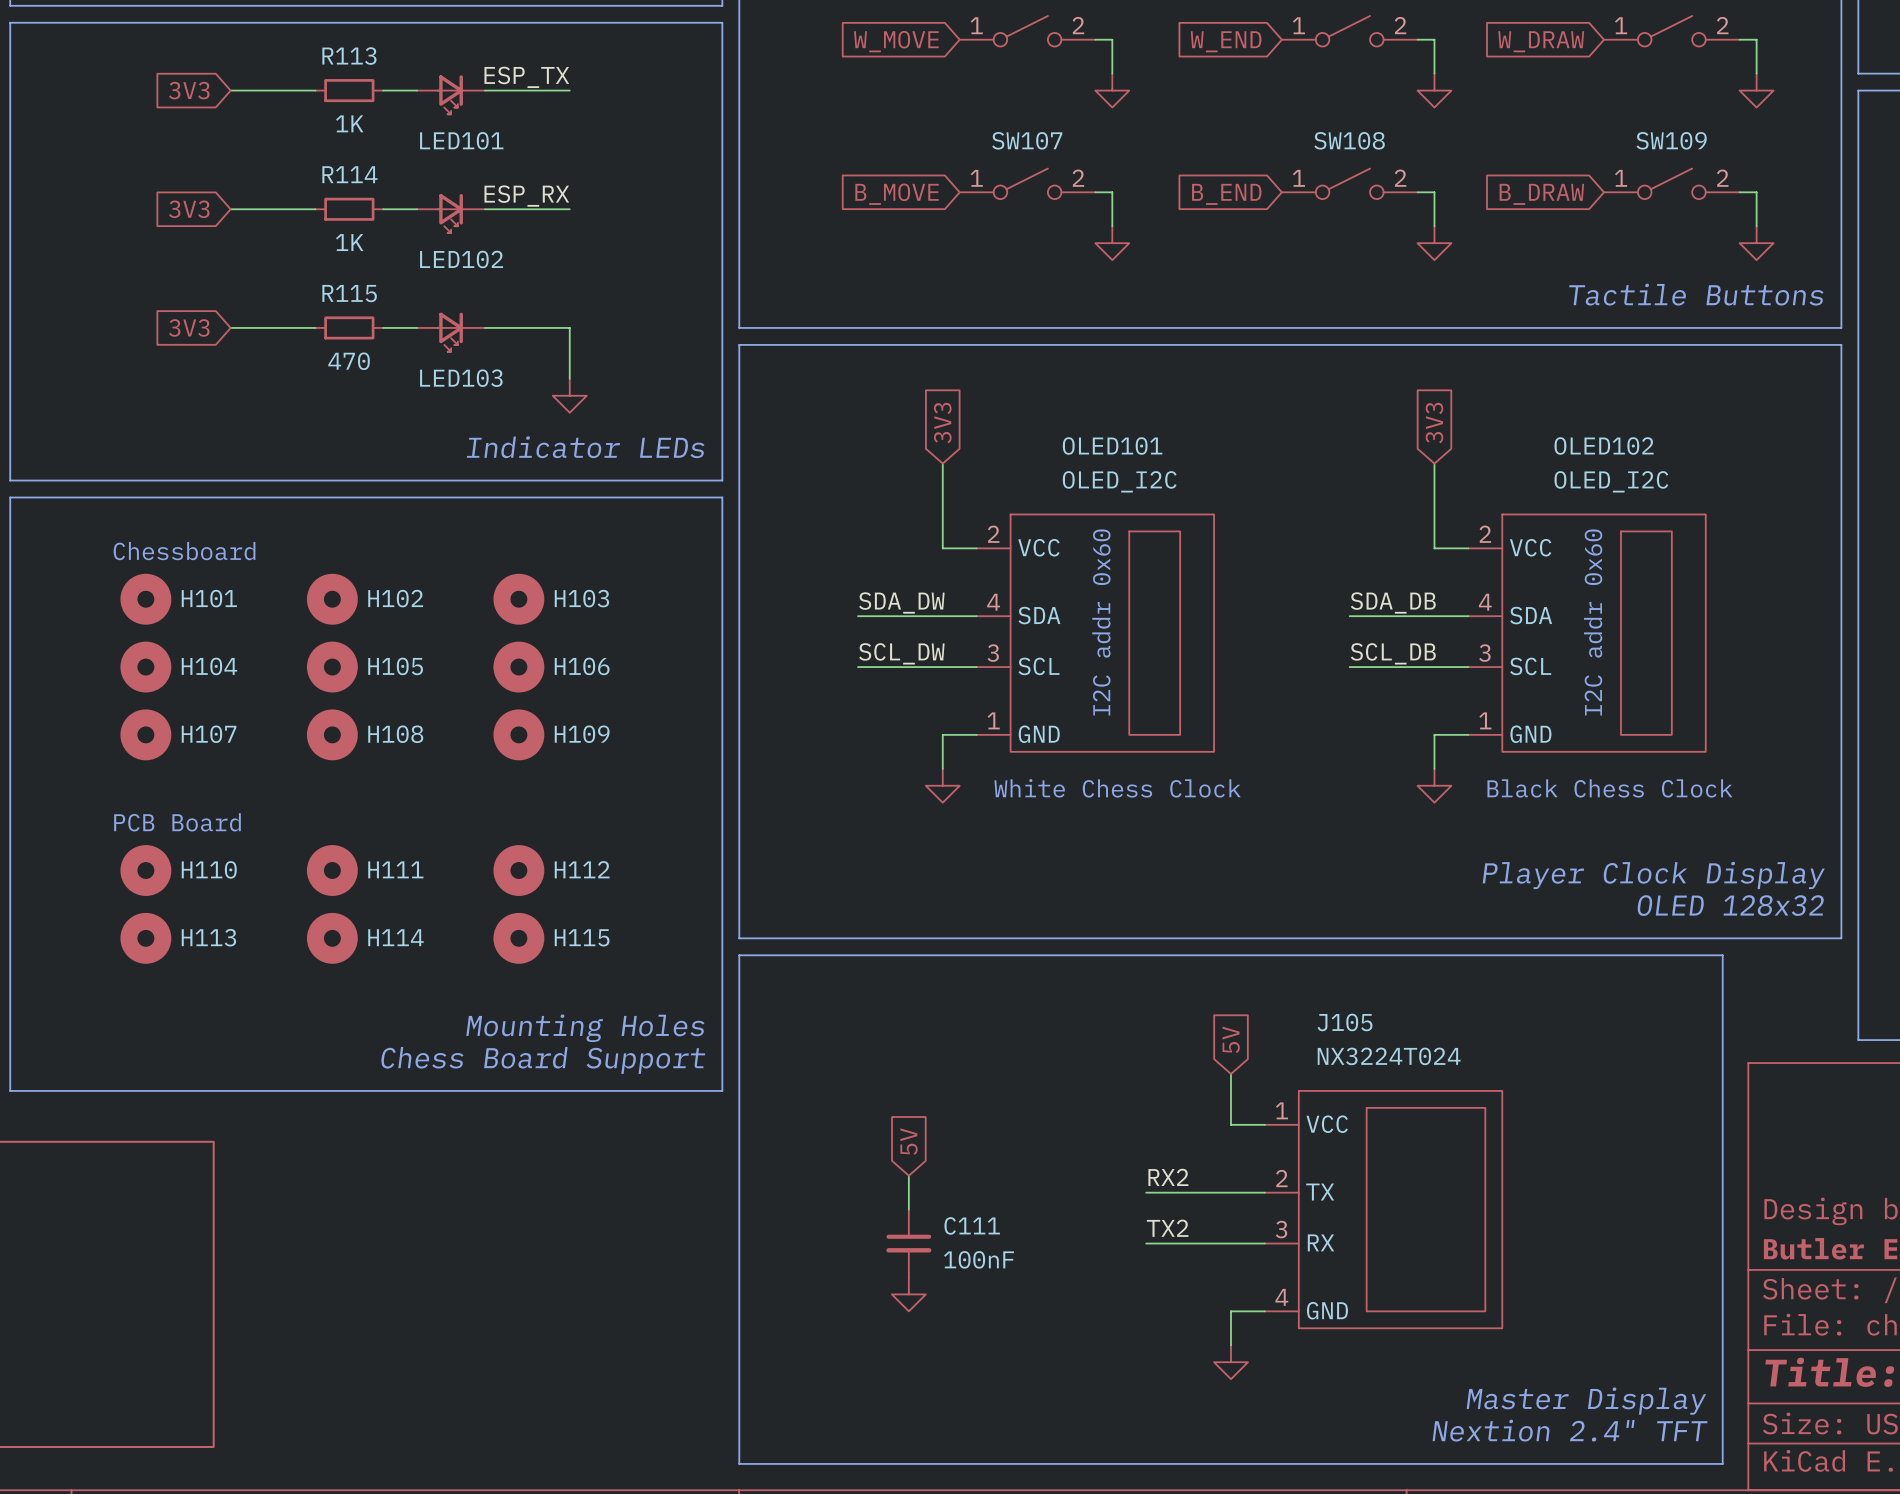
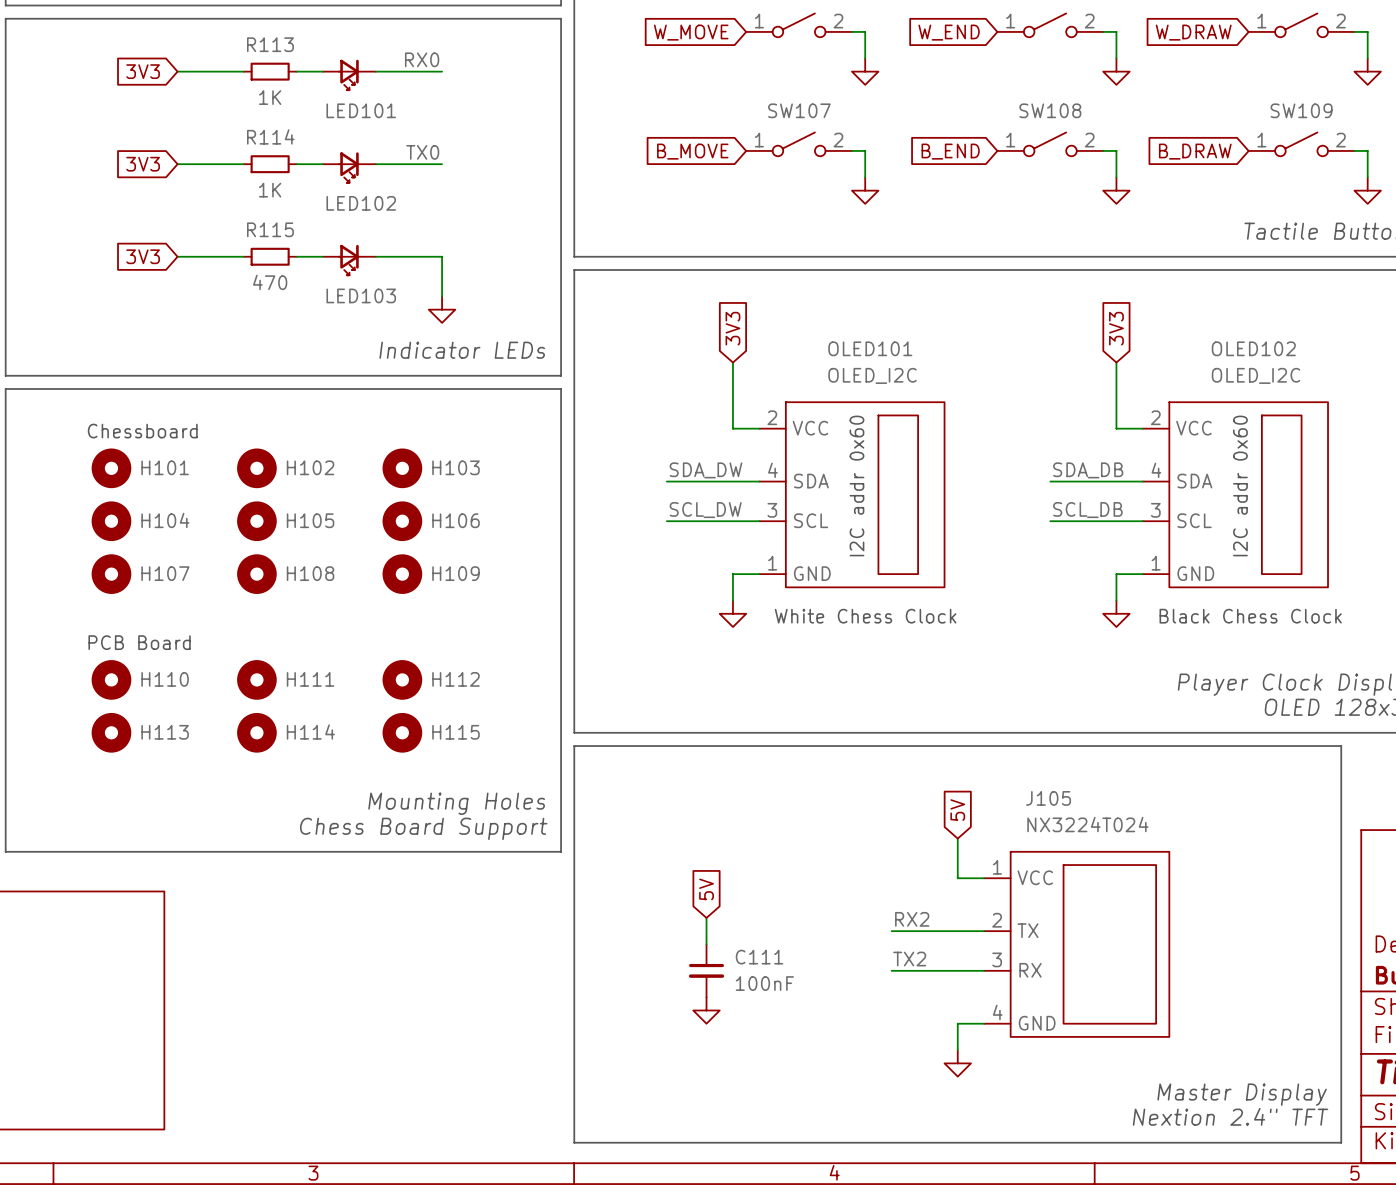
label: ESP_TX (526, 77) -> RX0 (422, 59)
label: ESP_RX (526, 196) -> TX0 (422, 152)

